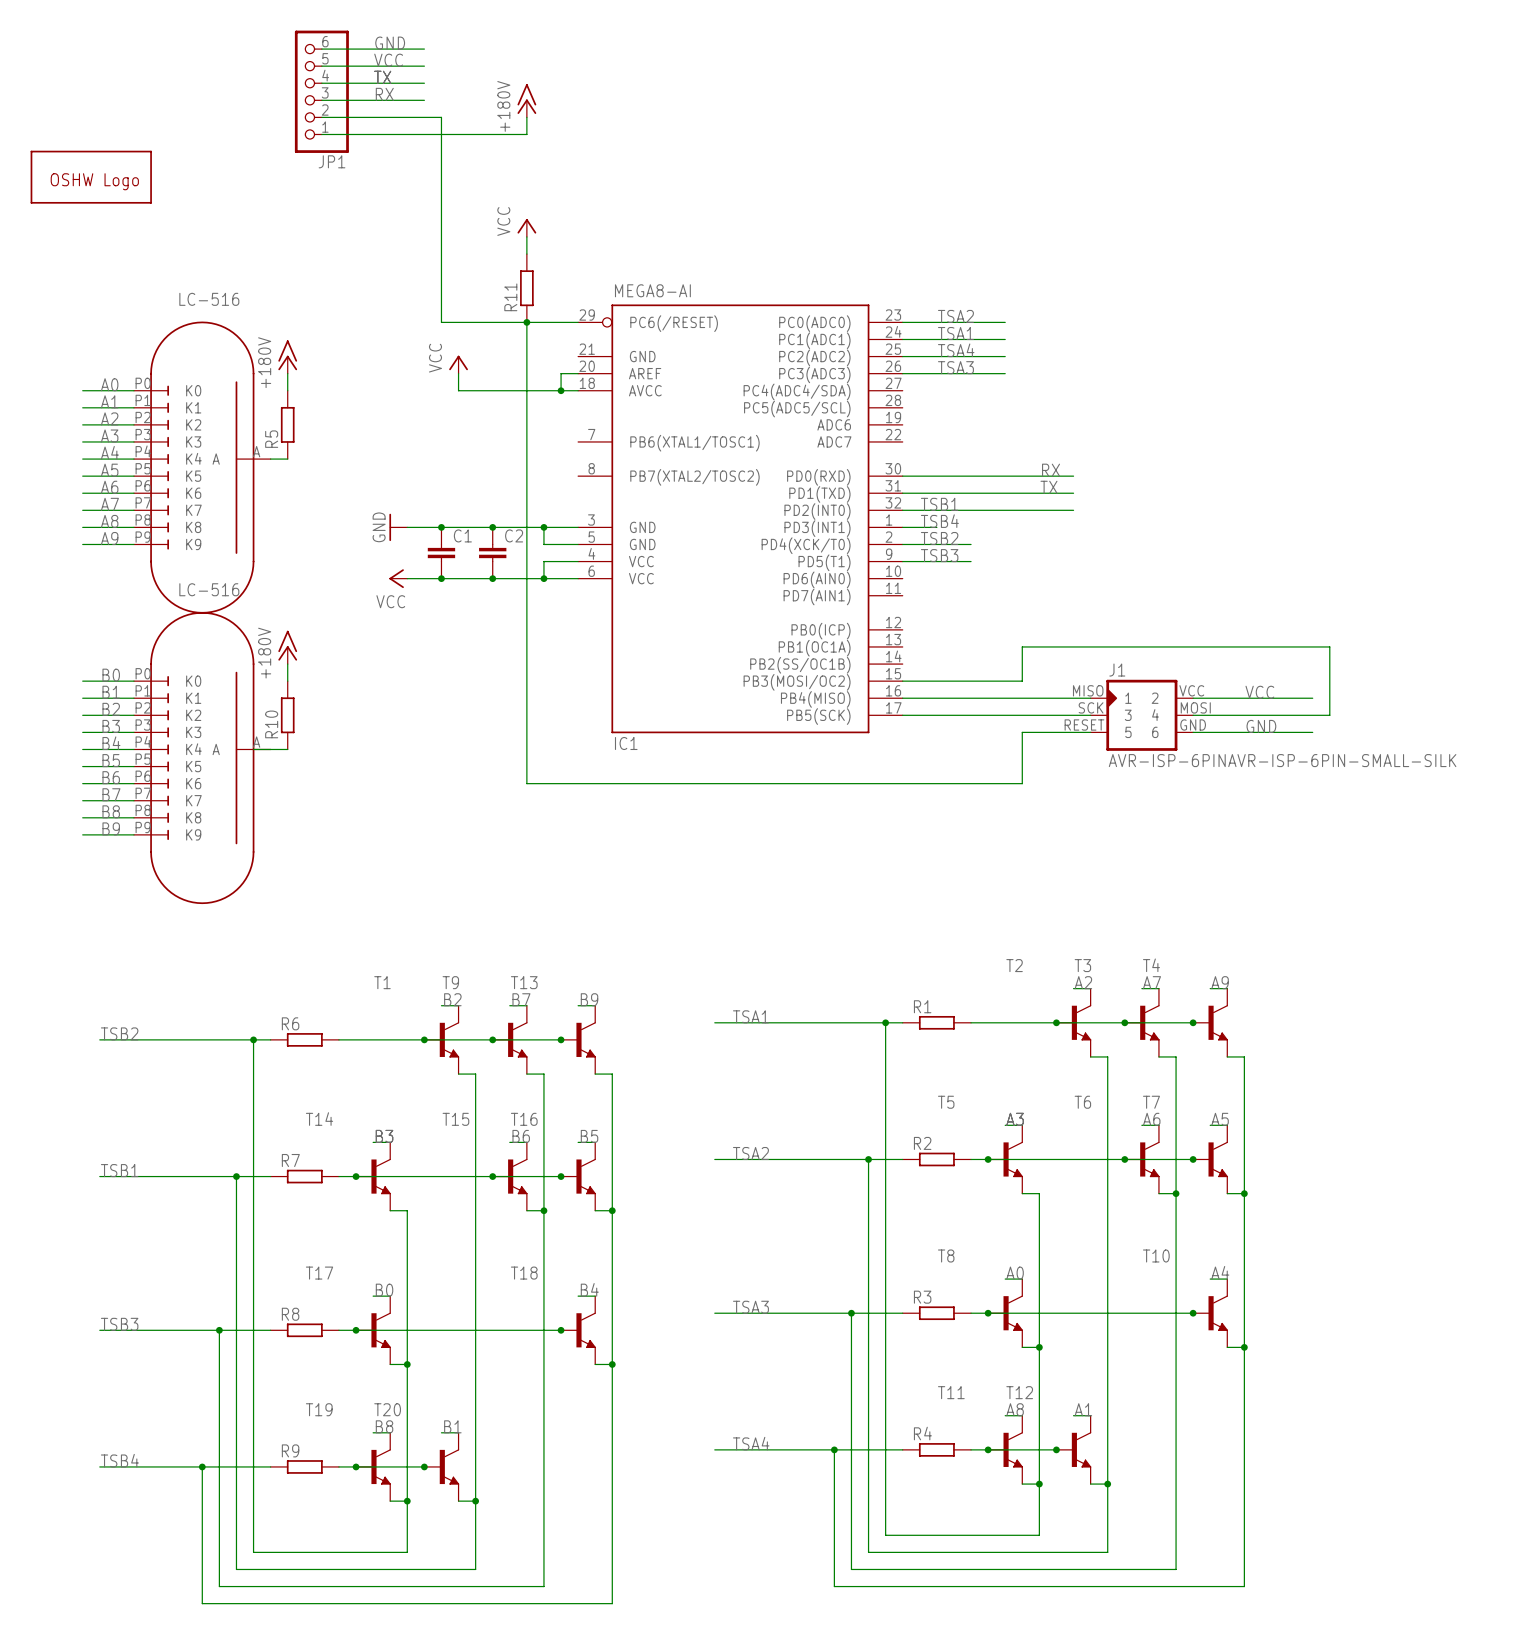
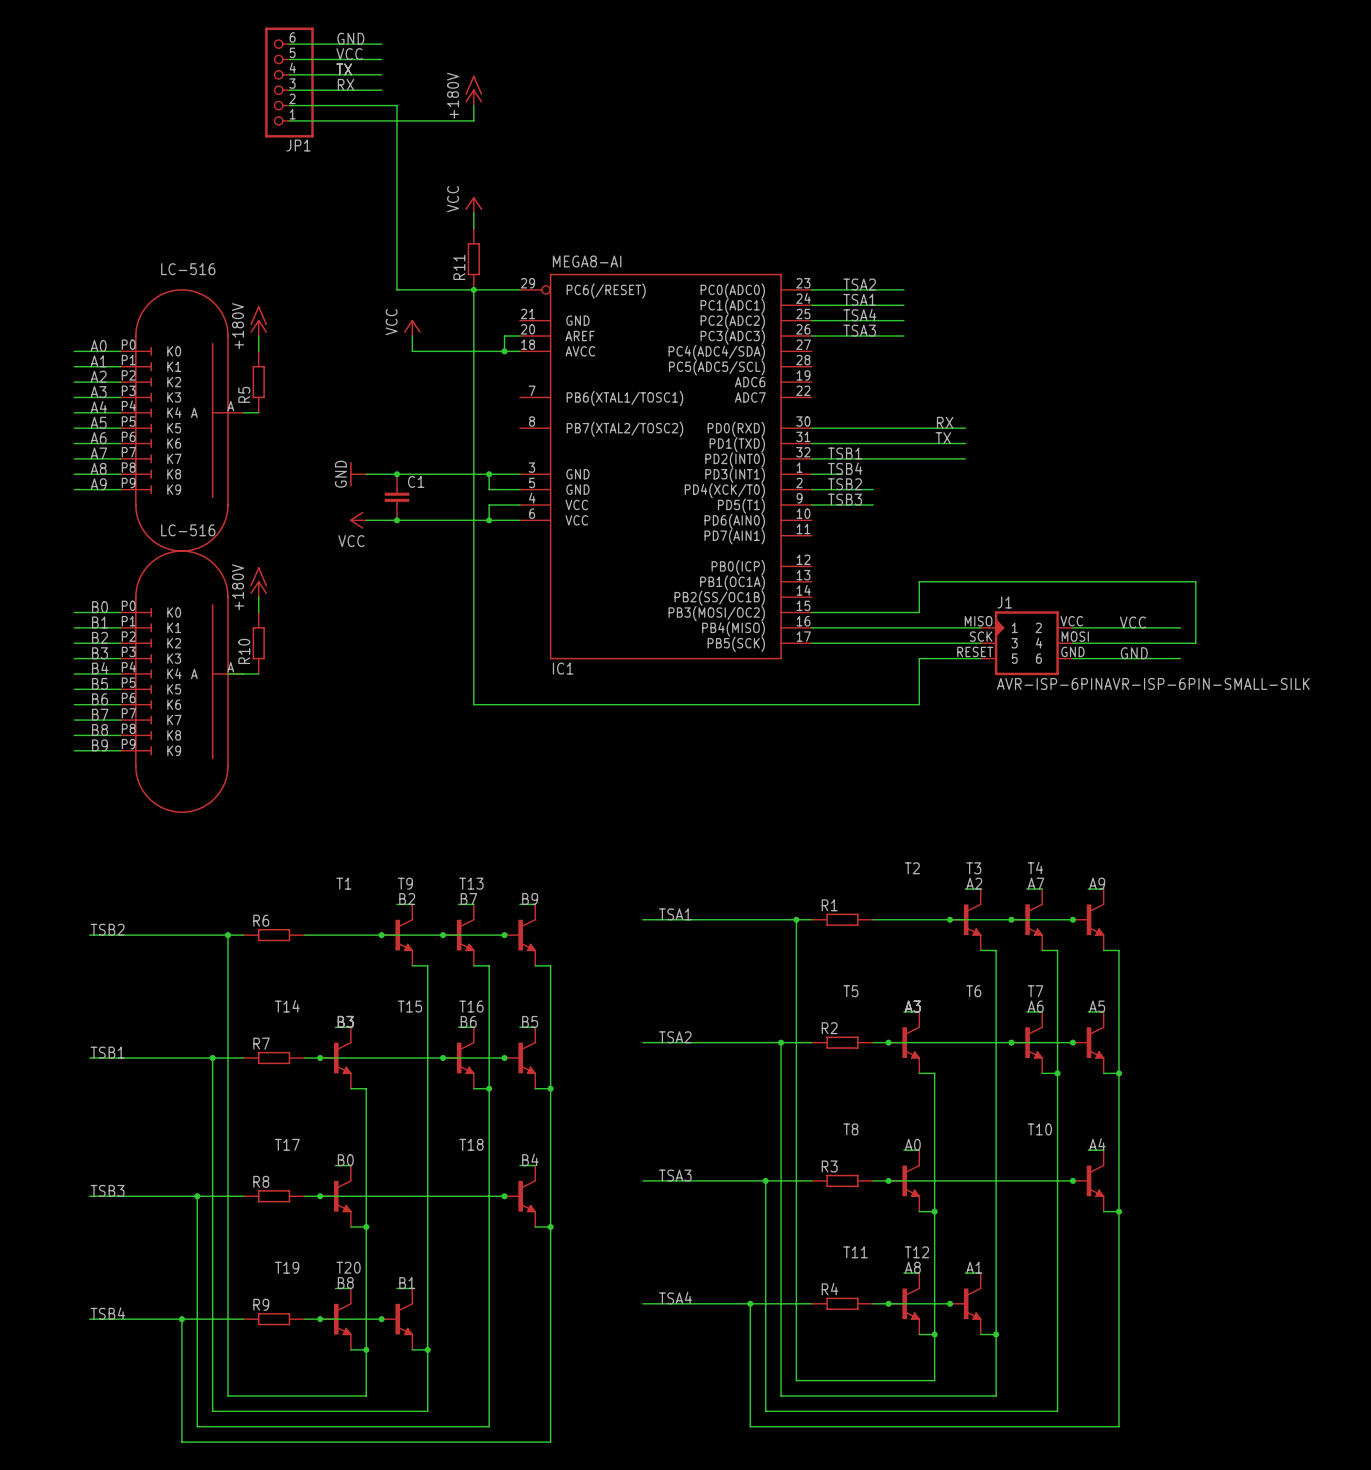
part: (91, 177) -> none
junction: (492, 527) -> none
C2: (492, 553) -> none
junction: (492, 578) -> none

